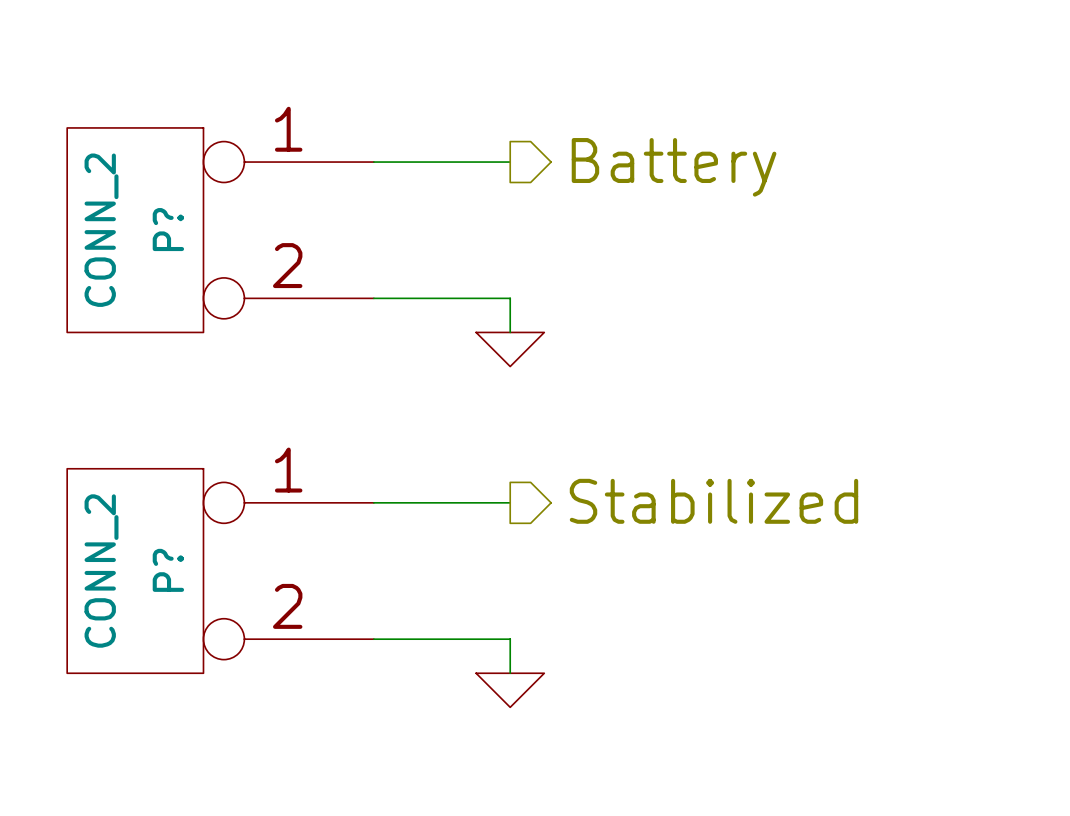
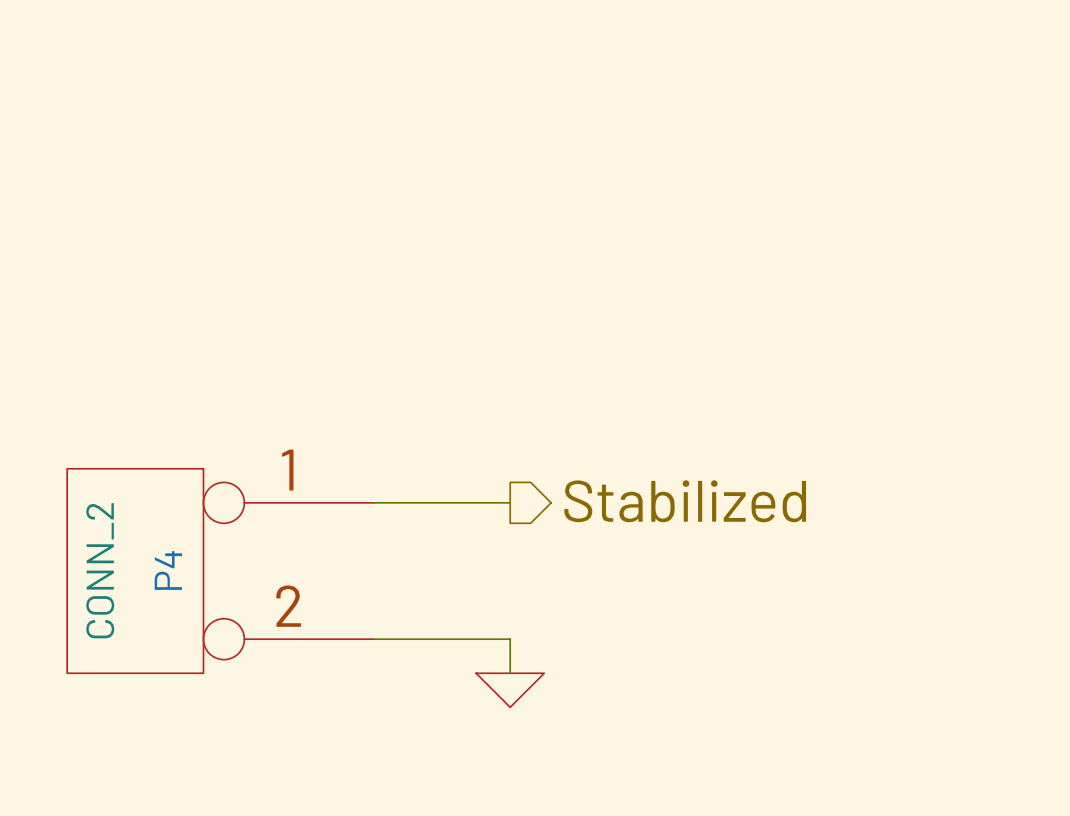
wire: (373, 162) (510, 162) -> none
hierarchical label: Battery (674, 167) -> none
P?: CONN_2 (220, 230) -> none
wire: (373, 298) (510, 298) (510, 332) -> none
power symbol: (510, 349) -> none
P? name: P? (168, 570) -> P4 (168, 570)

